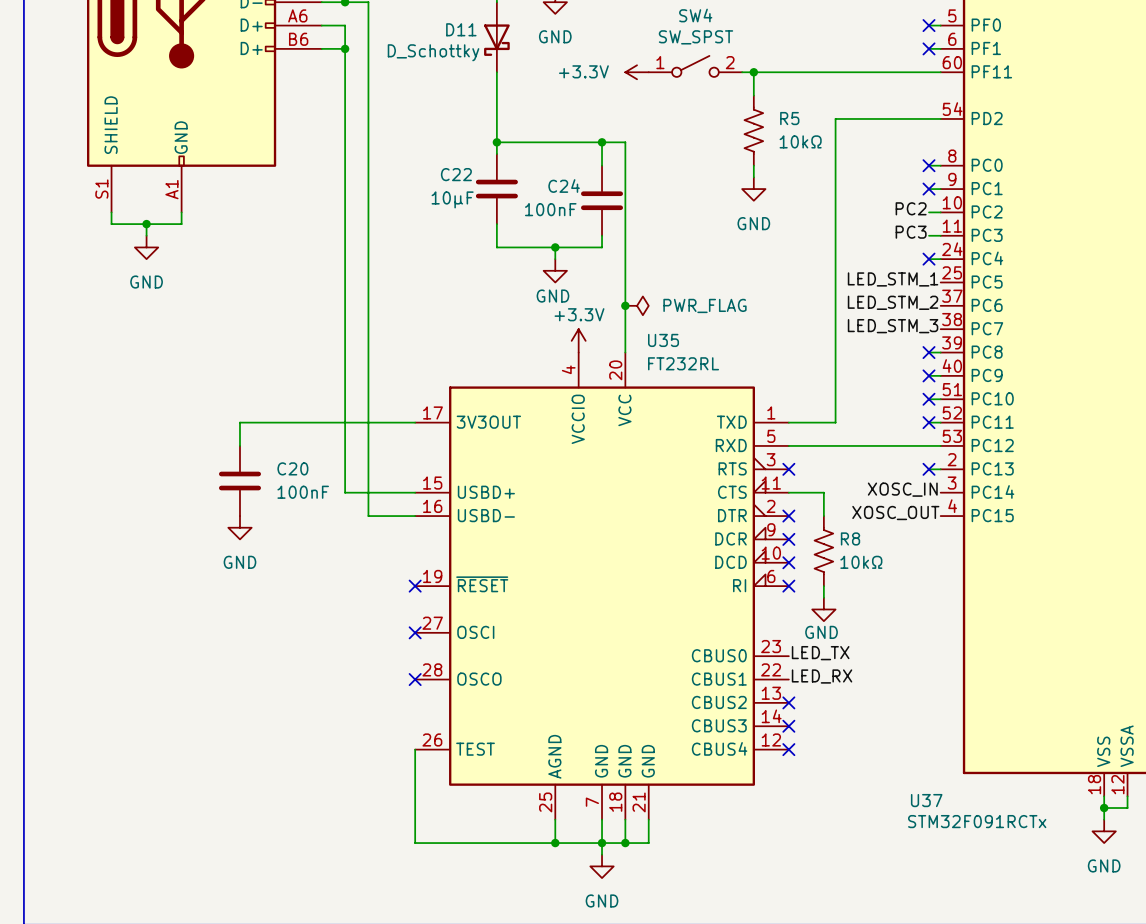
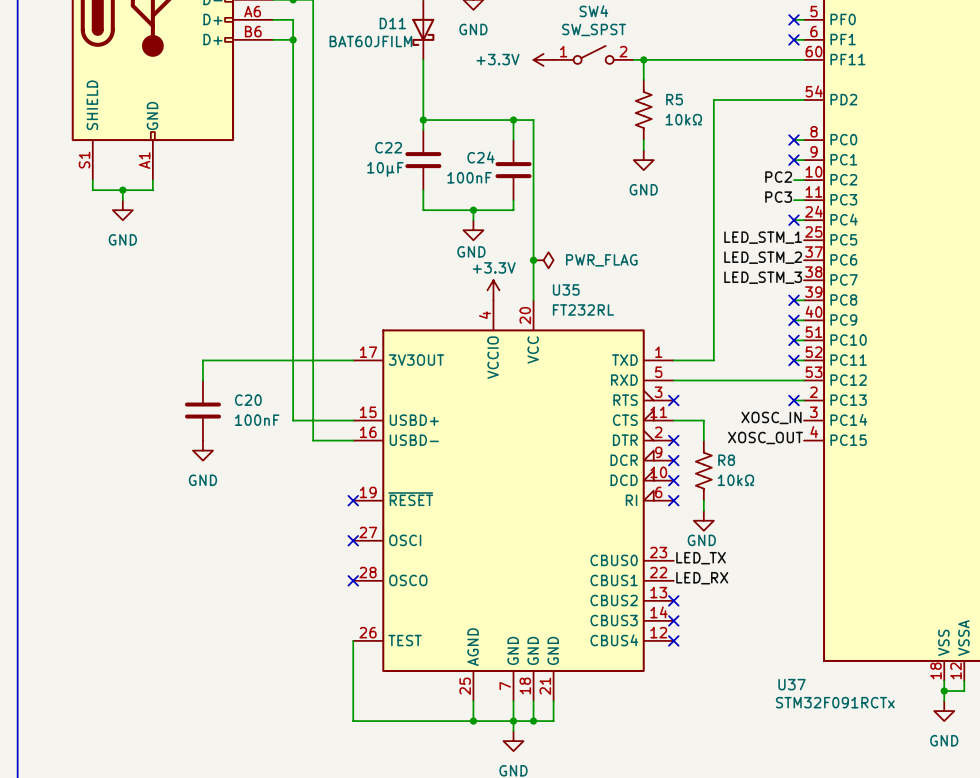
D11 value: D_Schottky (433, 52) -> BAT60JFILM (370, 41)

